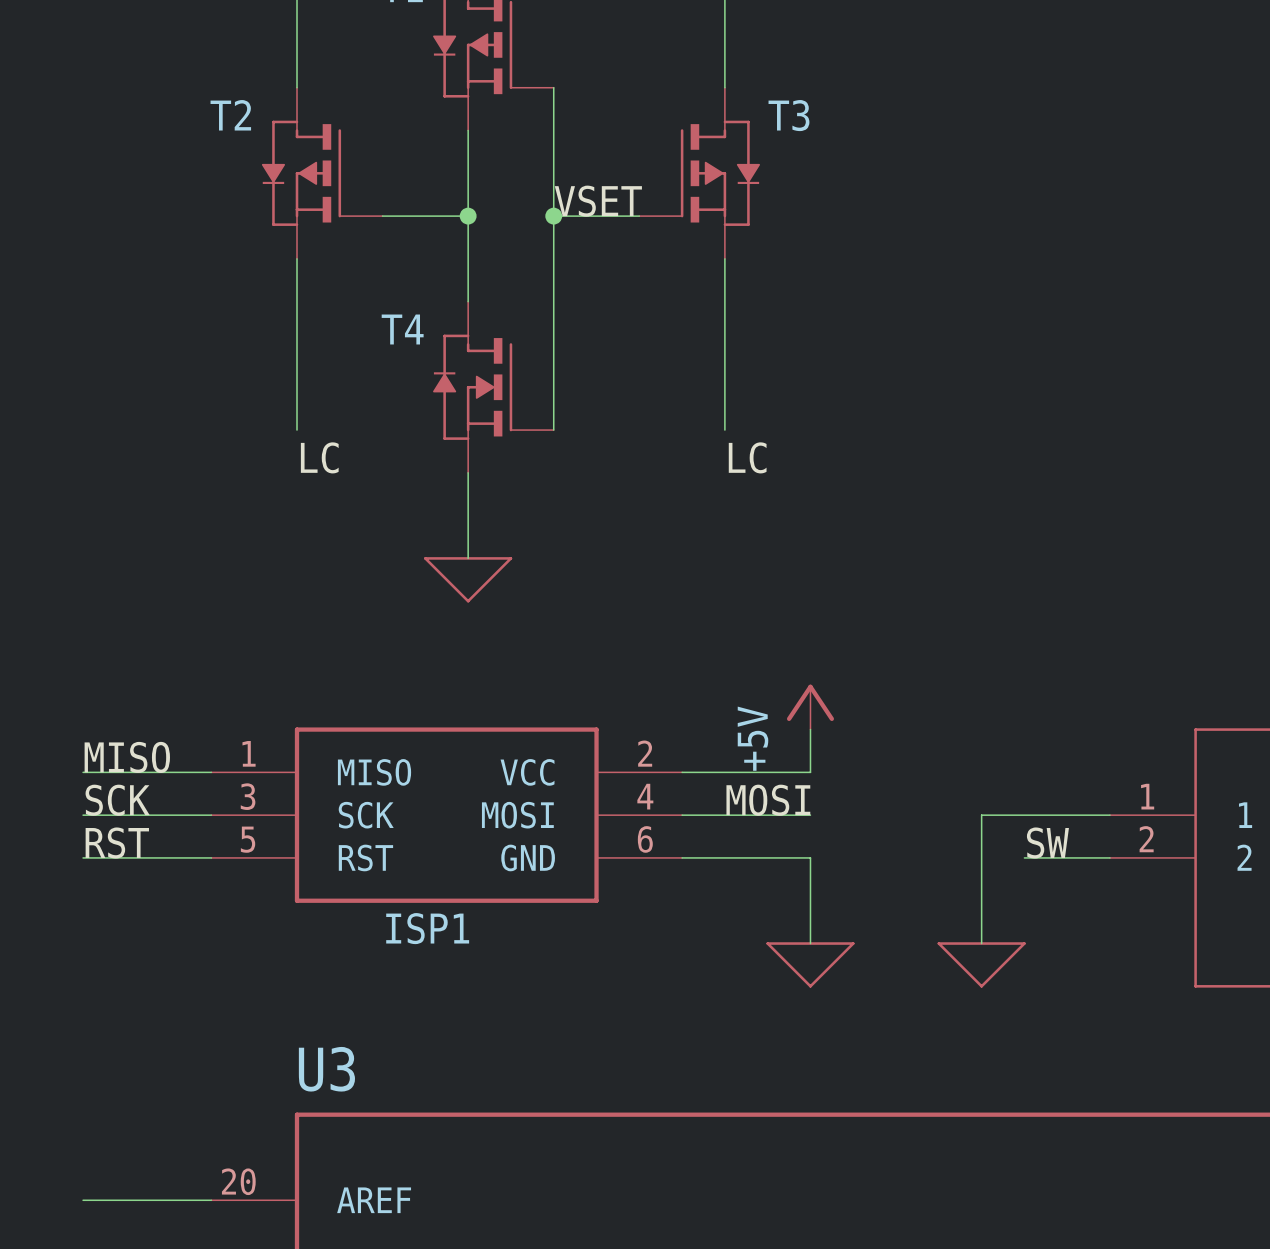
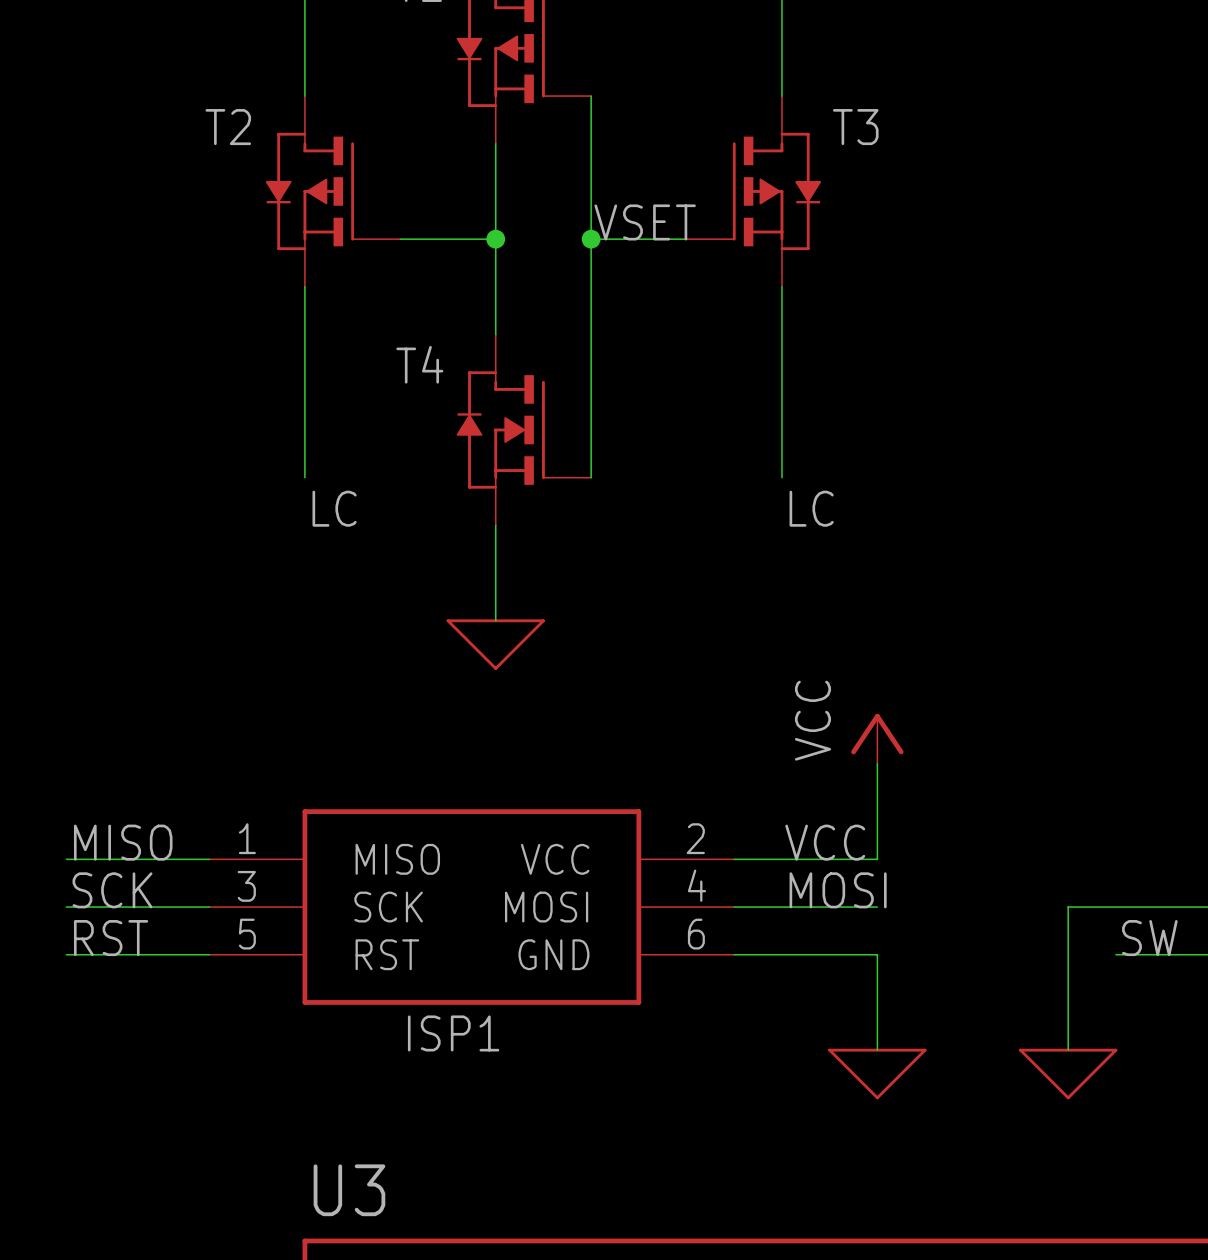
power symbol: none -> VCC (877, 738)
power symbol: +5V (810, 707) -> none
label: none -> VCC (825, 842)

